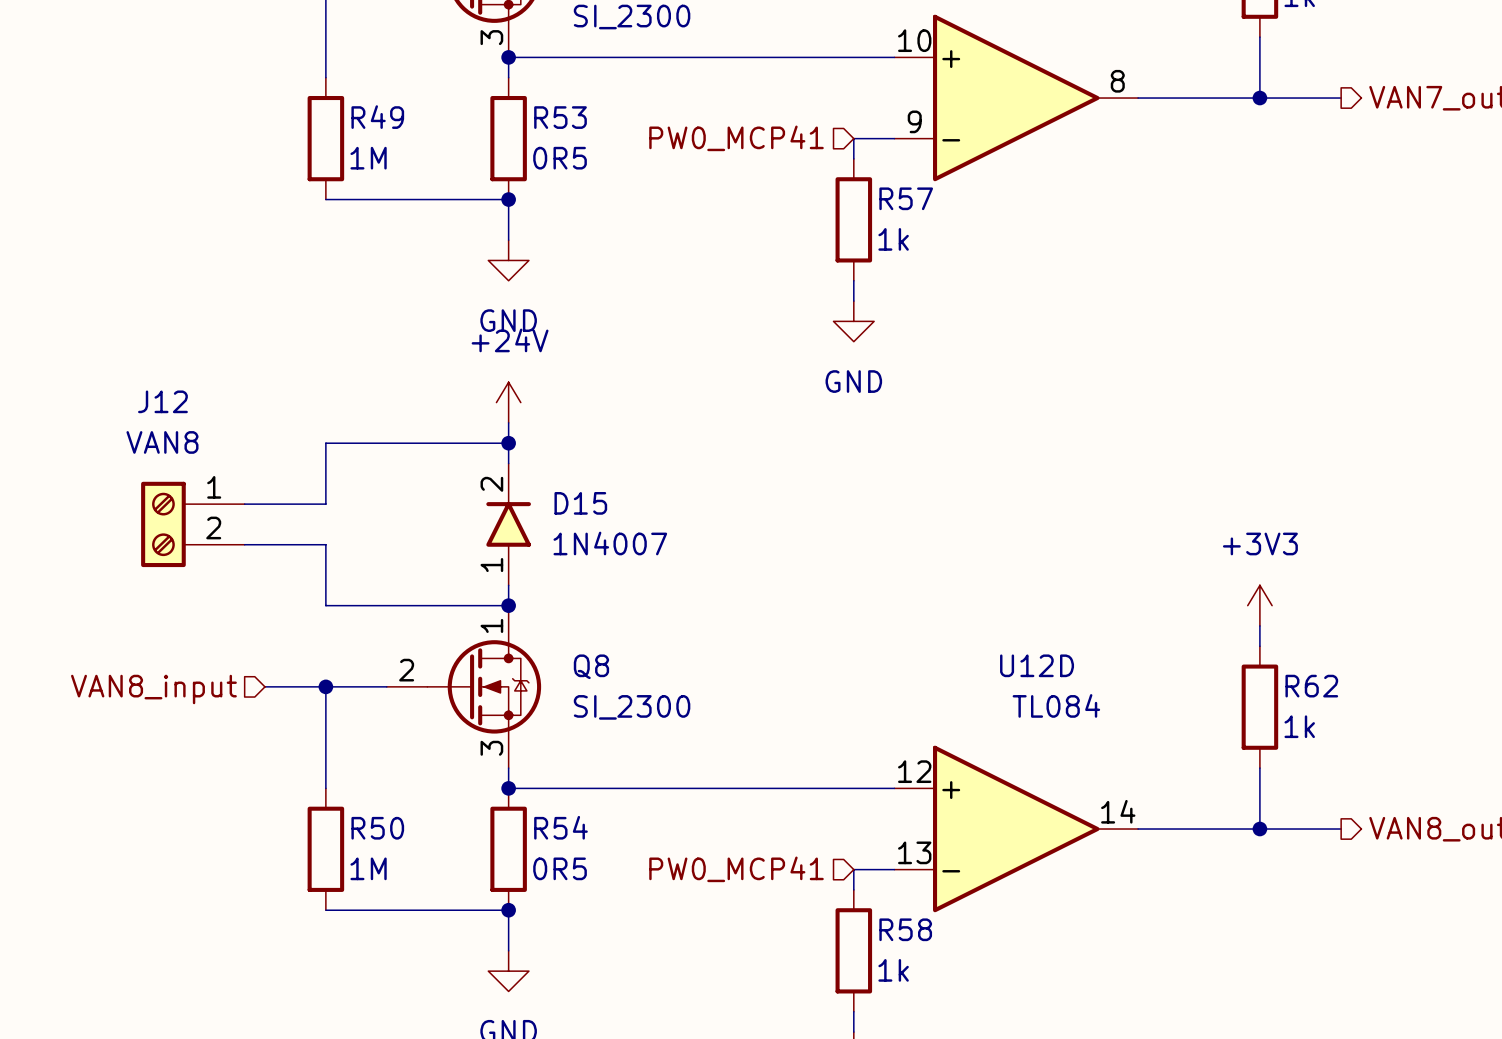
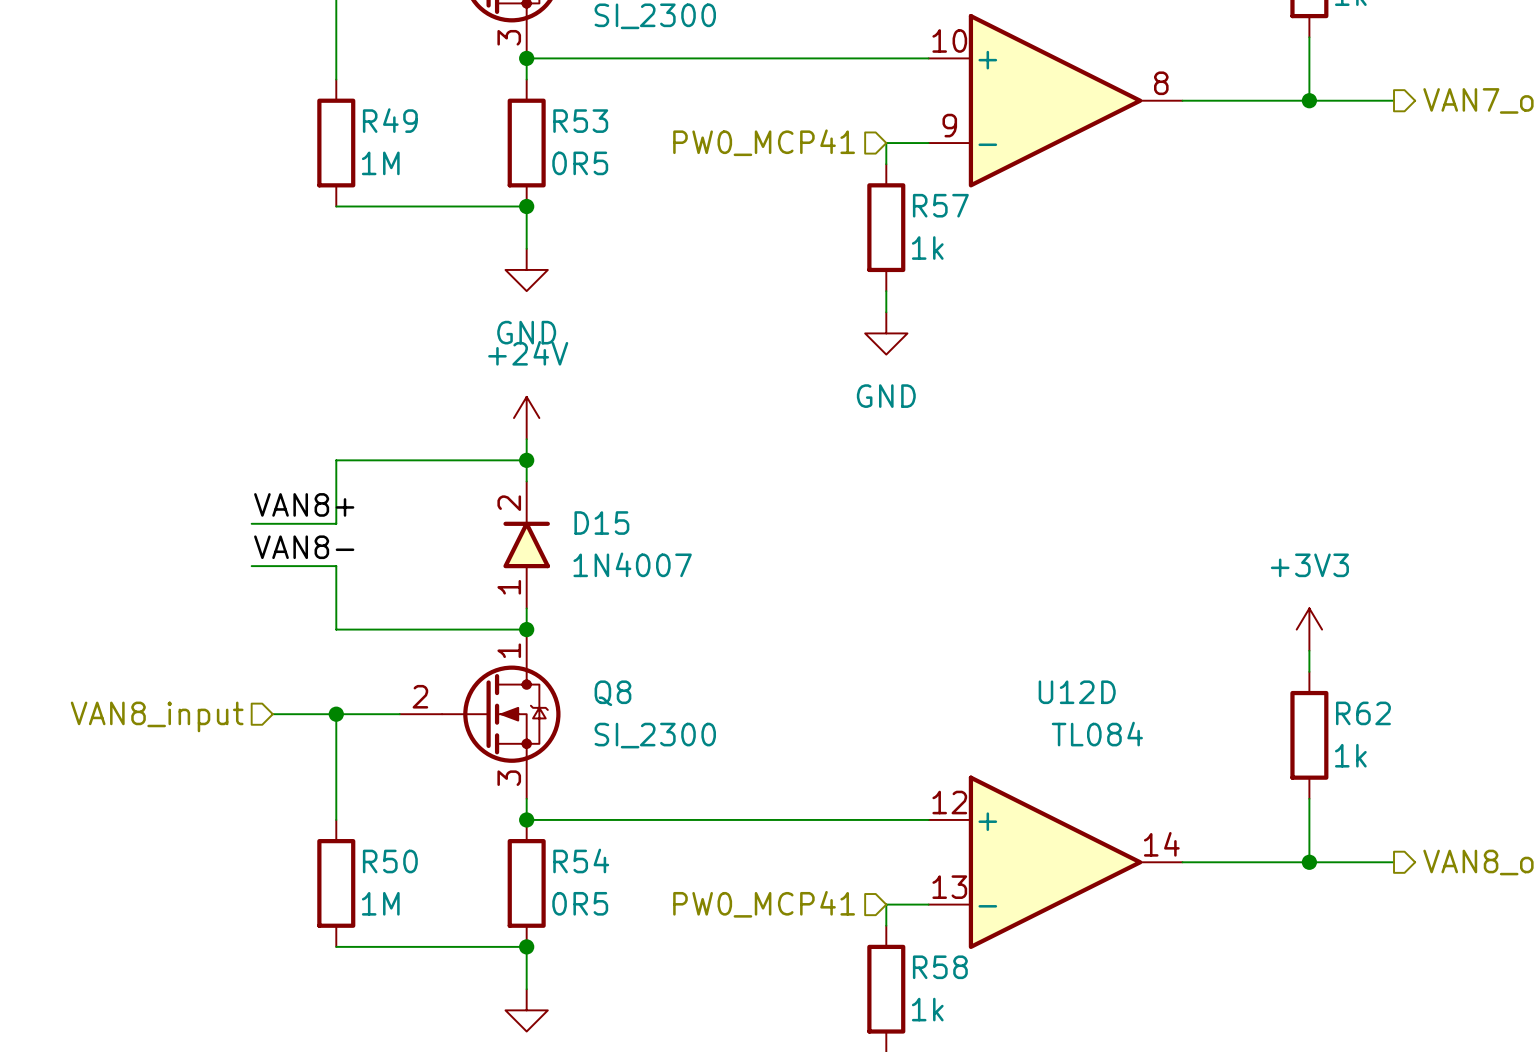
label: none -> VAN8+ (304, 504)
J12: VAN8 (192, 524) -> none
label: none -> VAN8- (304, 547)

